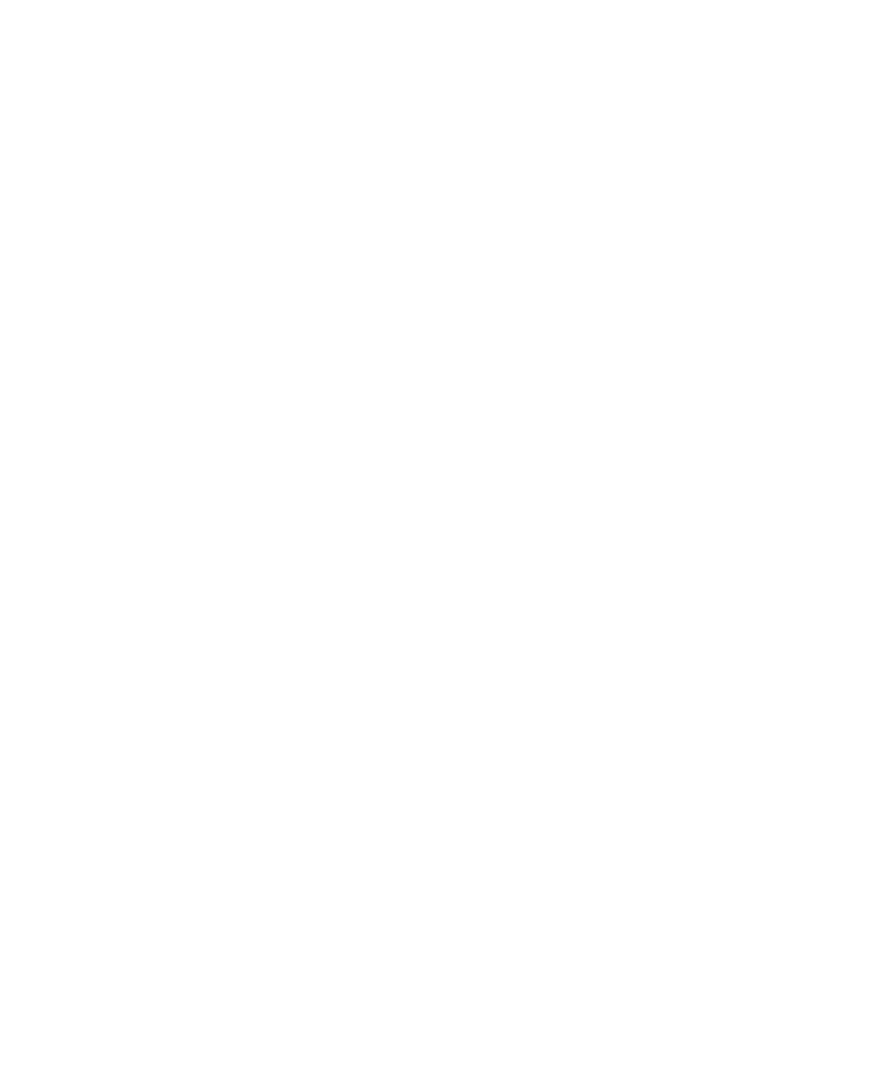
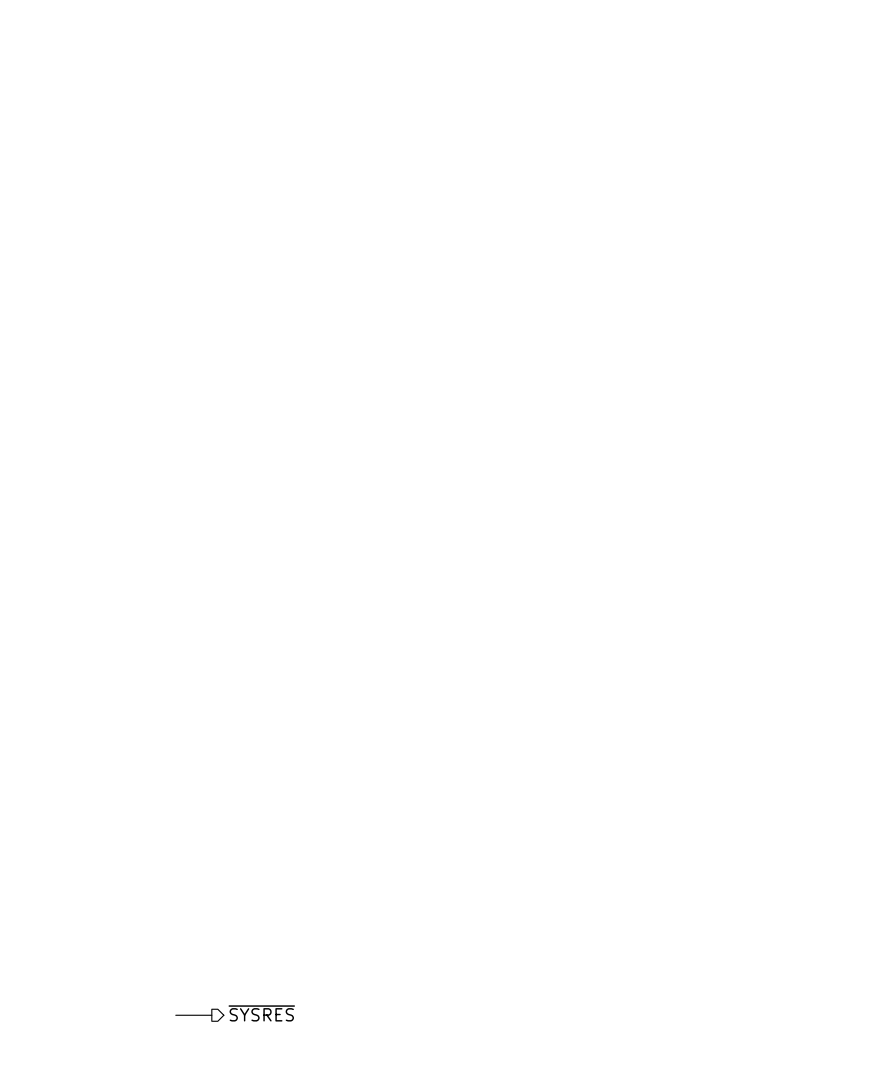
hierarchical label: none -> ~{SYSRES} (261, 1013)
wire: none -> (175, 1015) (211, 1015)

